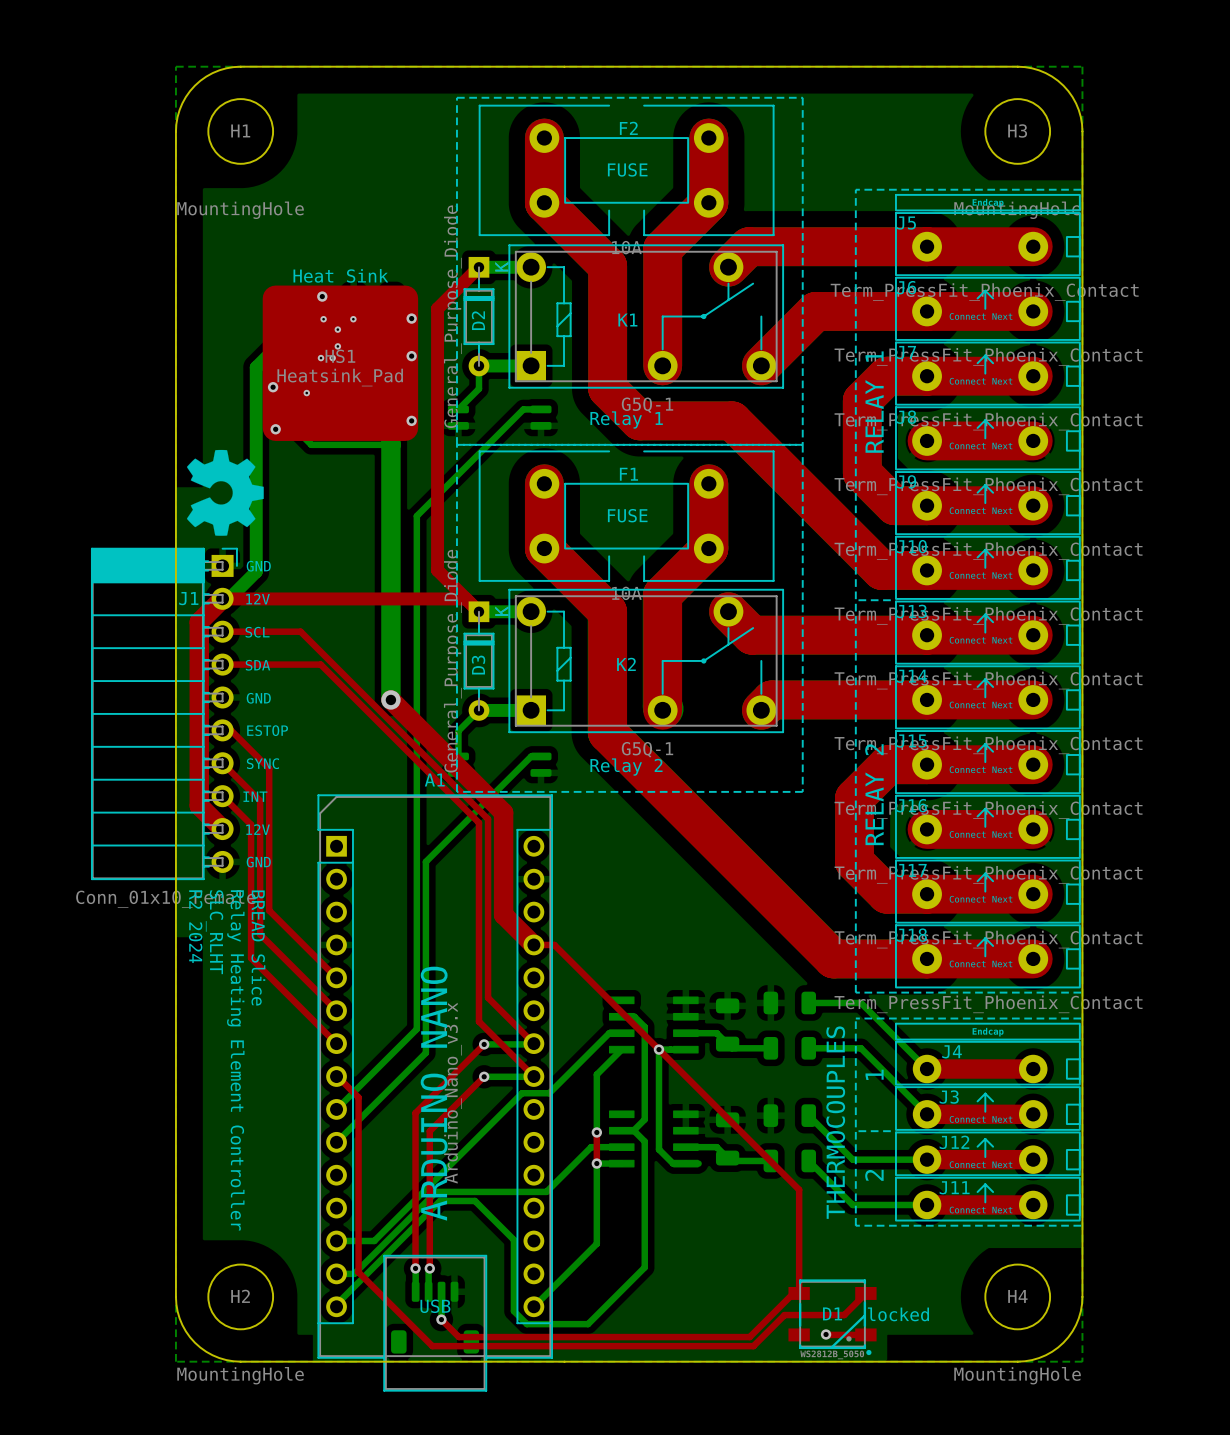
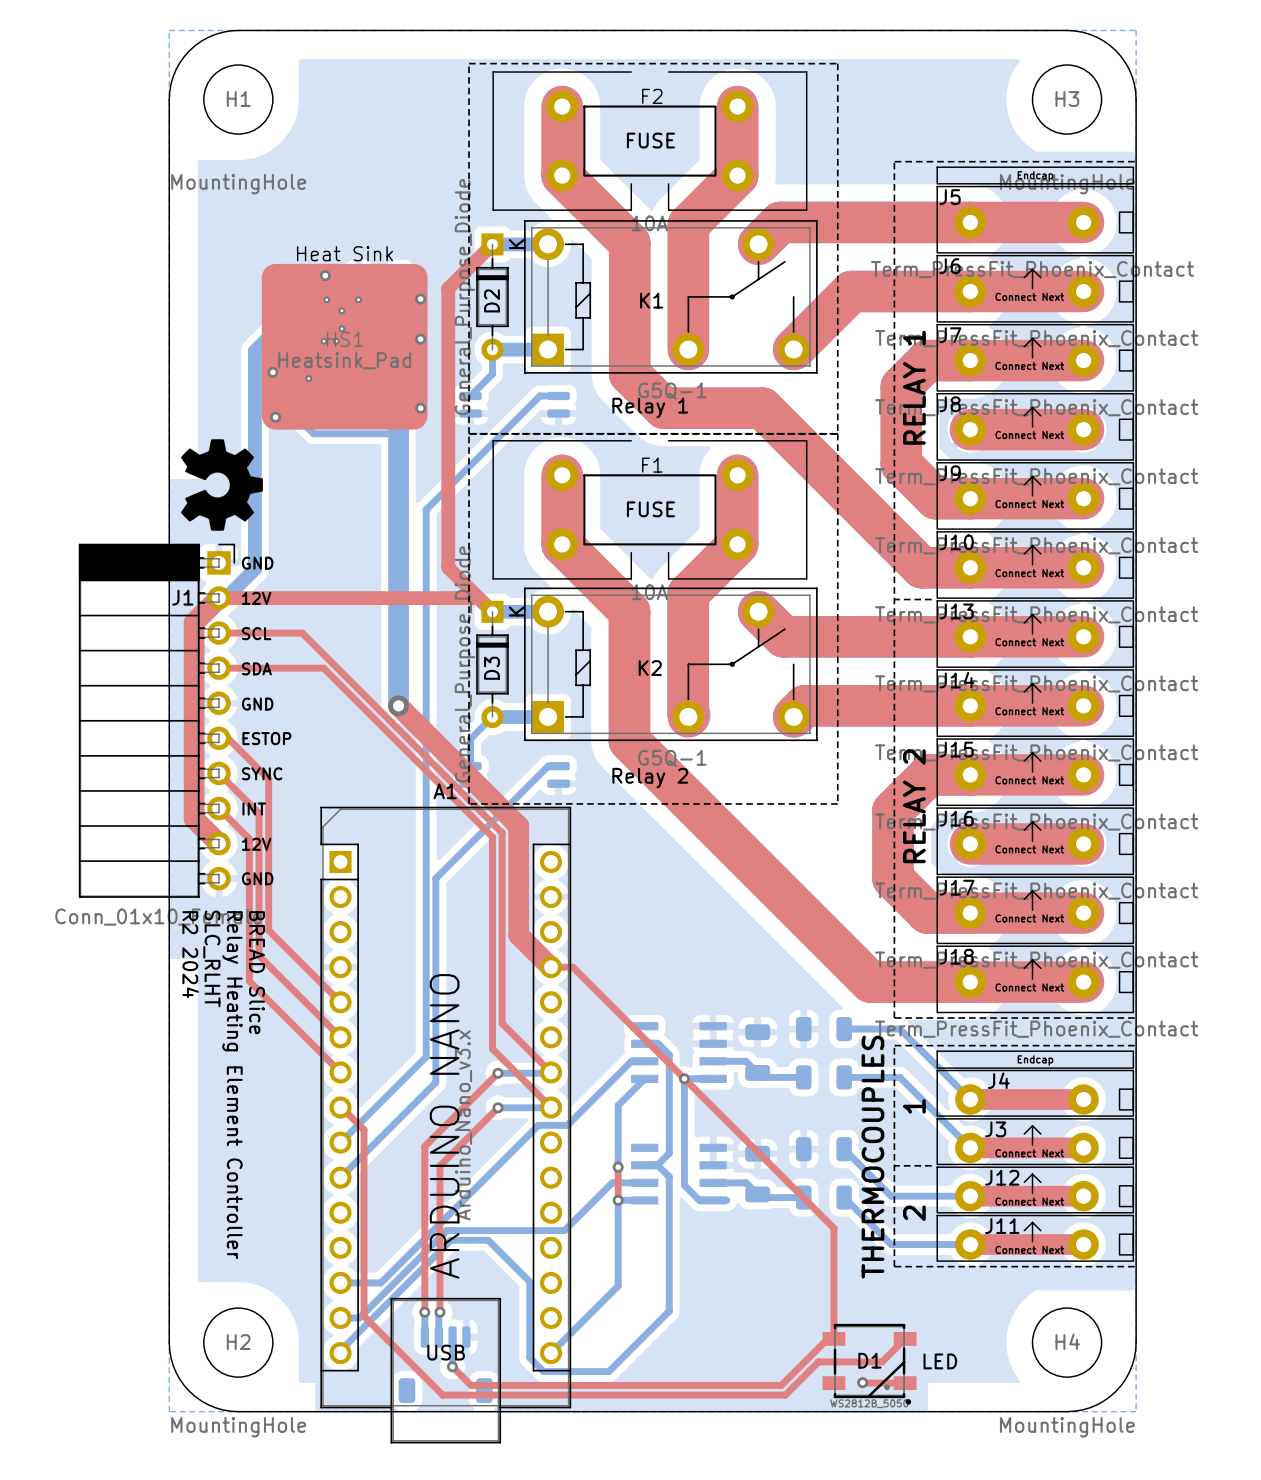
text: locked (898, 1314) -> LED (940, 1361)

